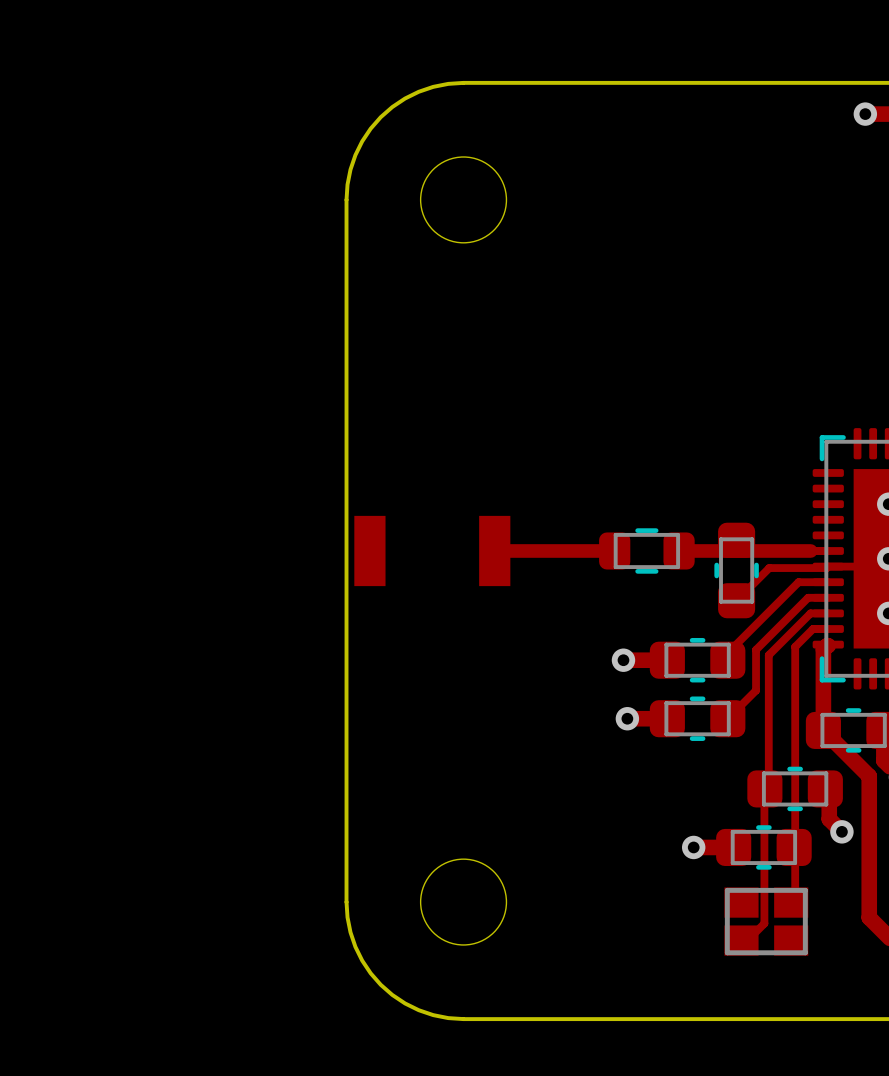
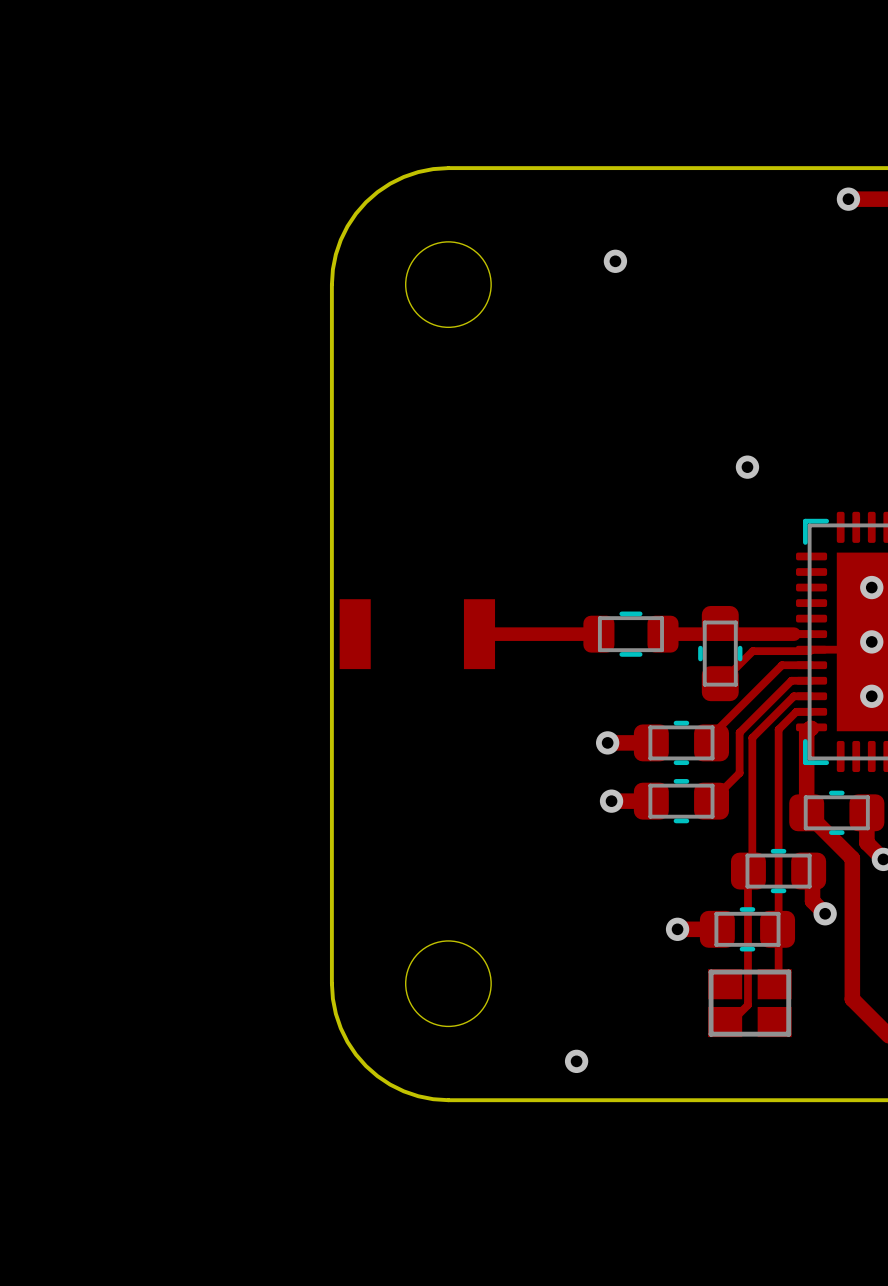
via: none -> (615, 261)
via: none -> (747, 467)
via: none -> (576, 1061)

